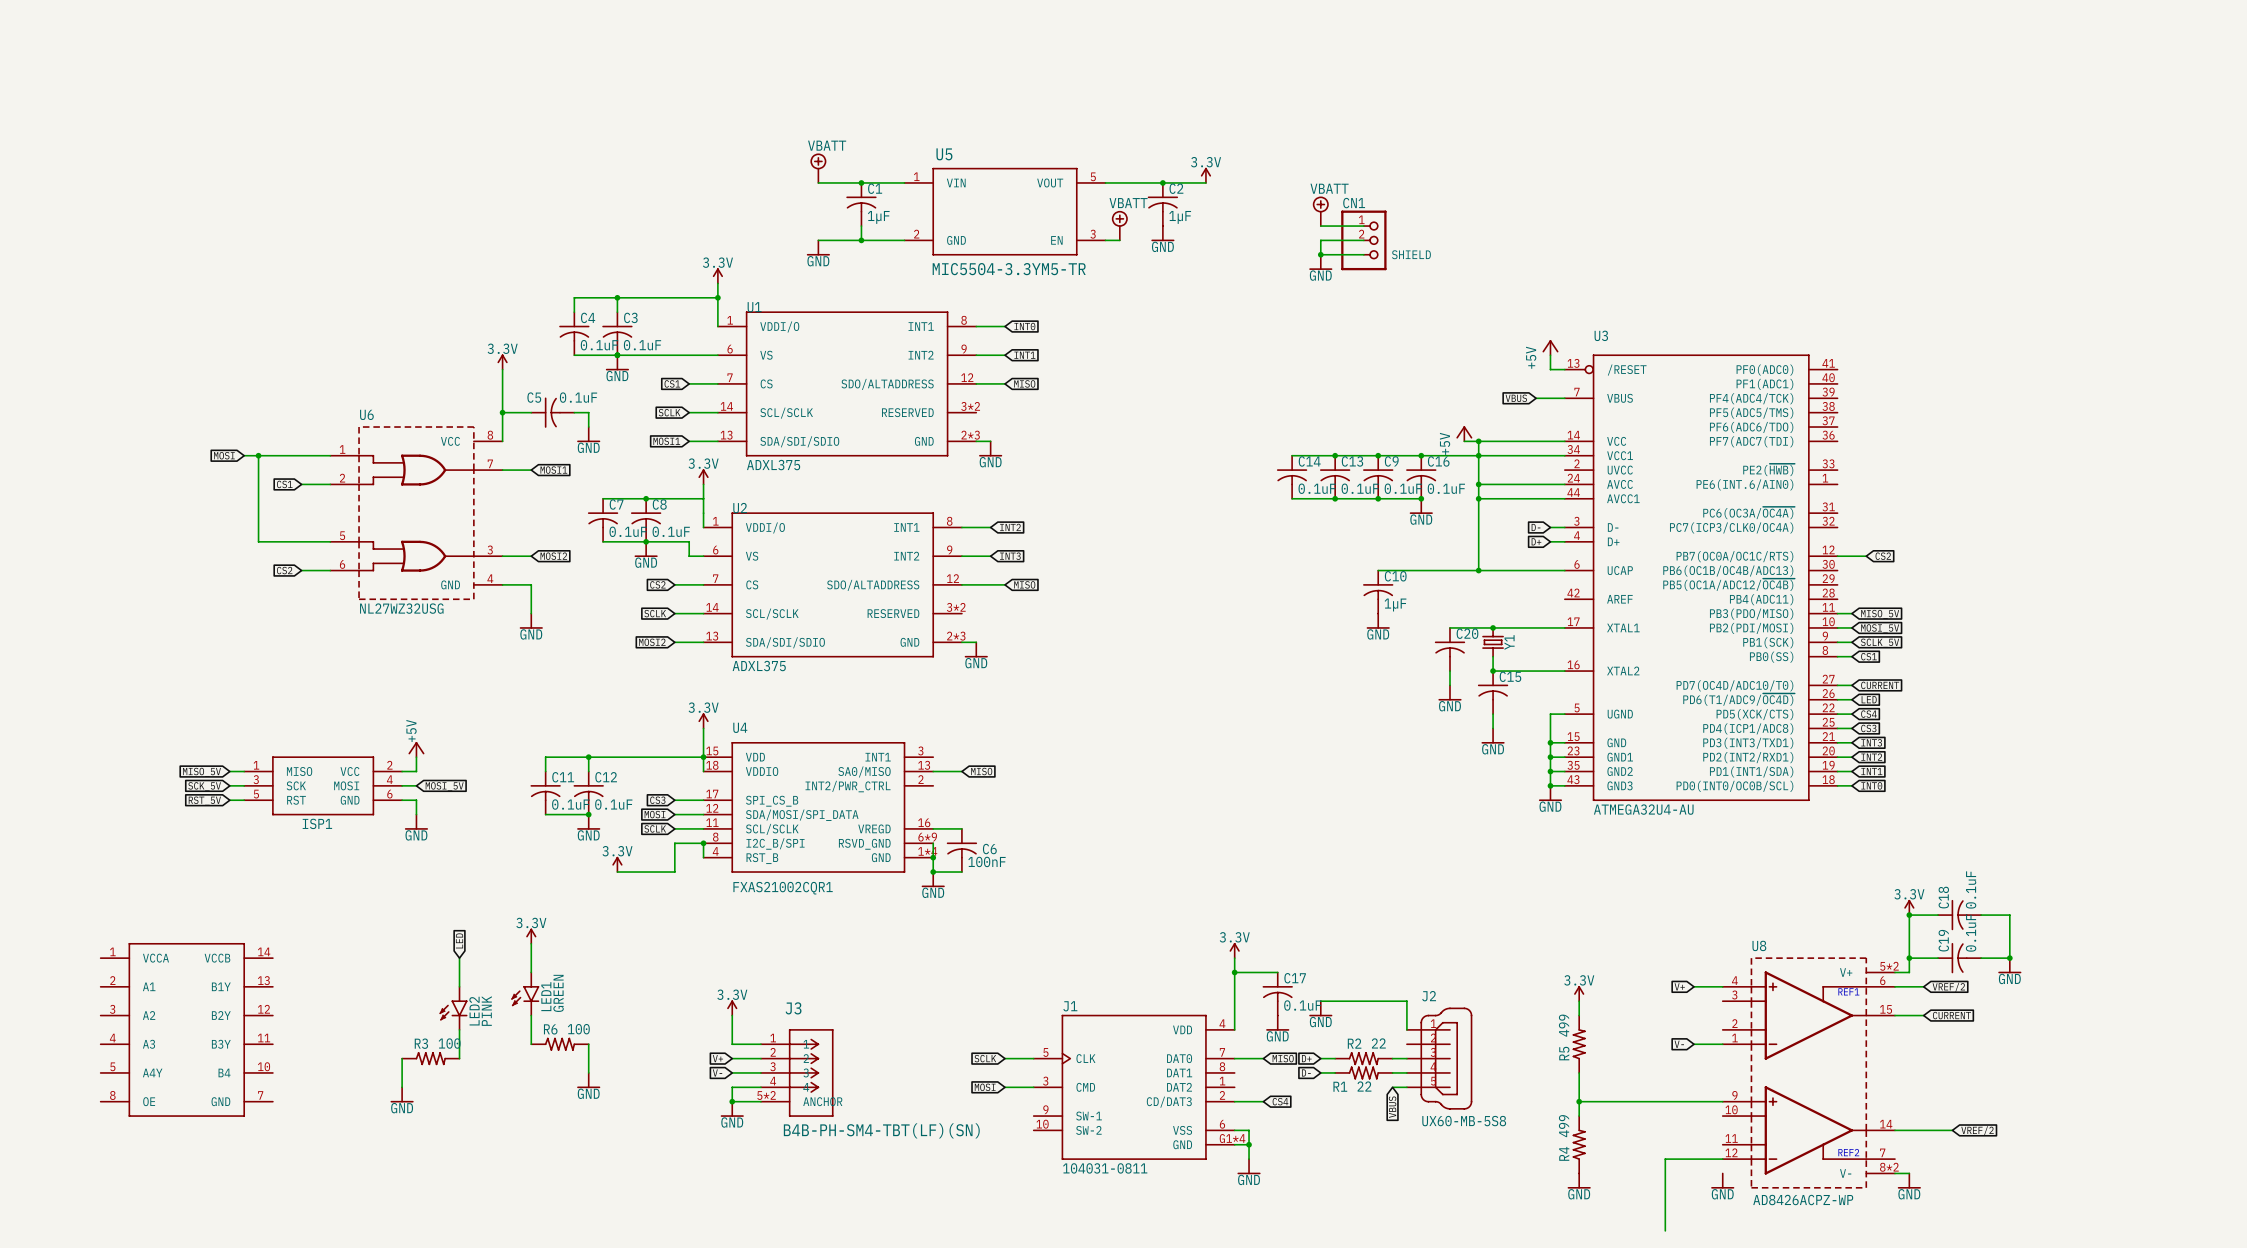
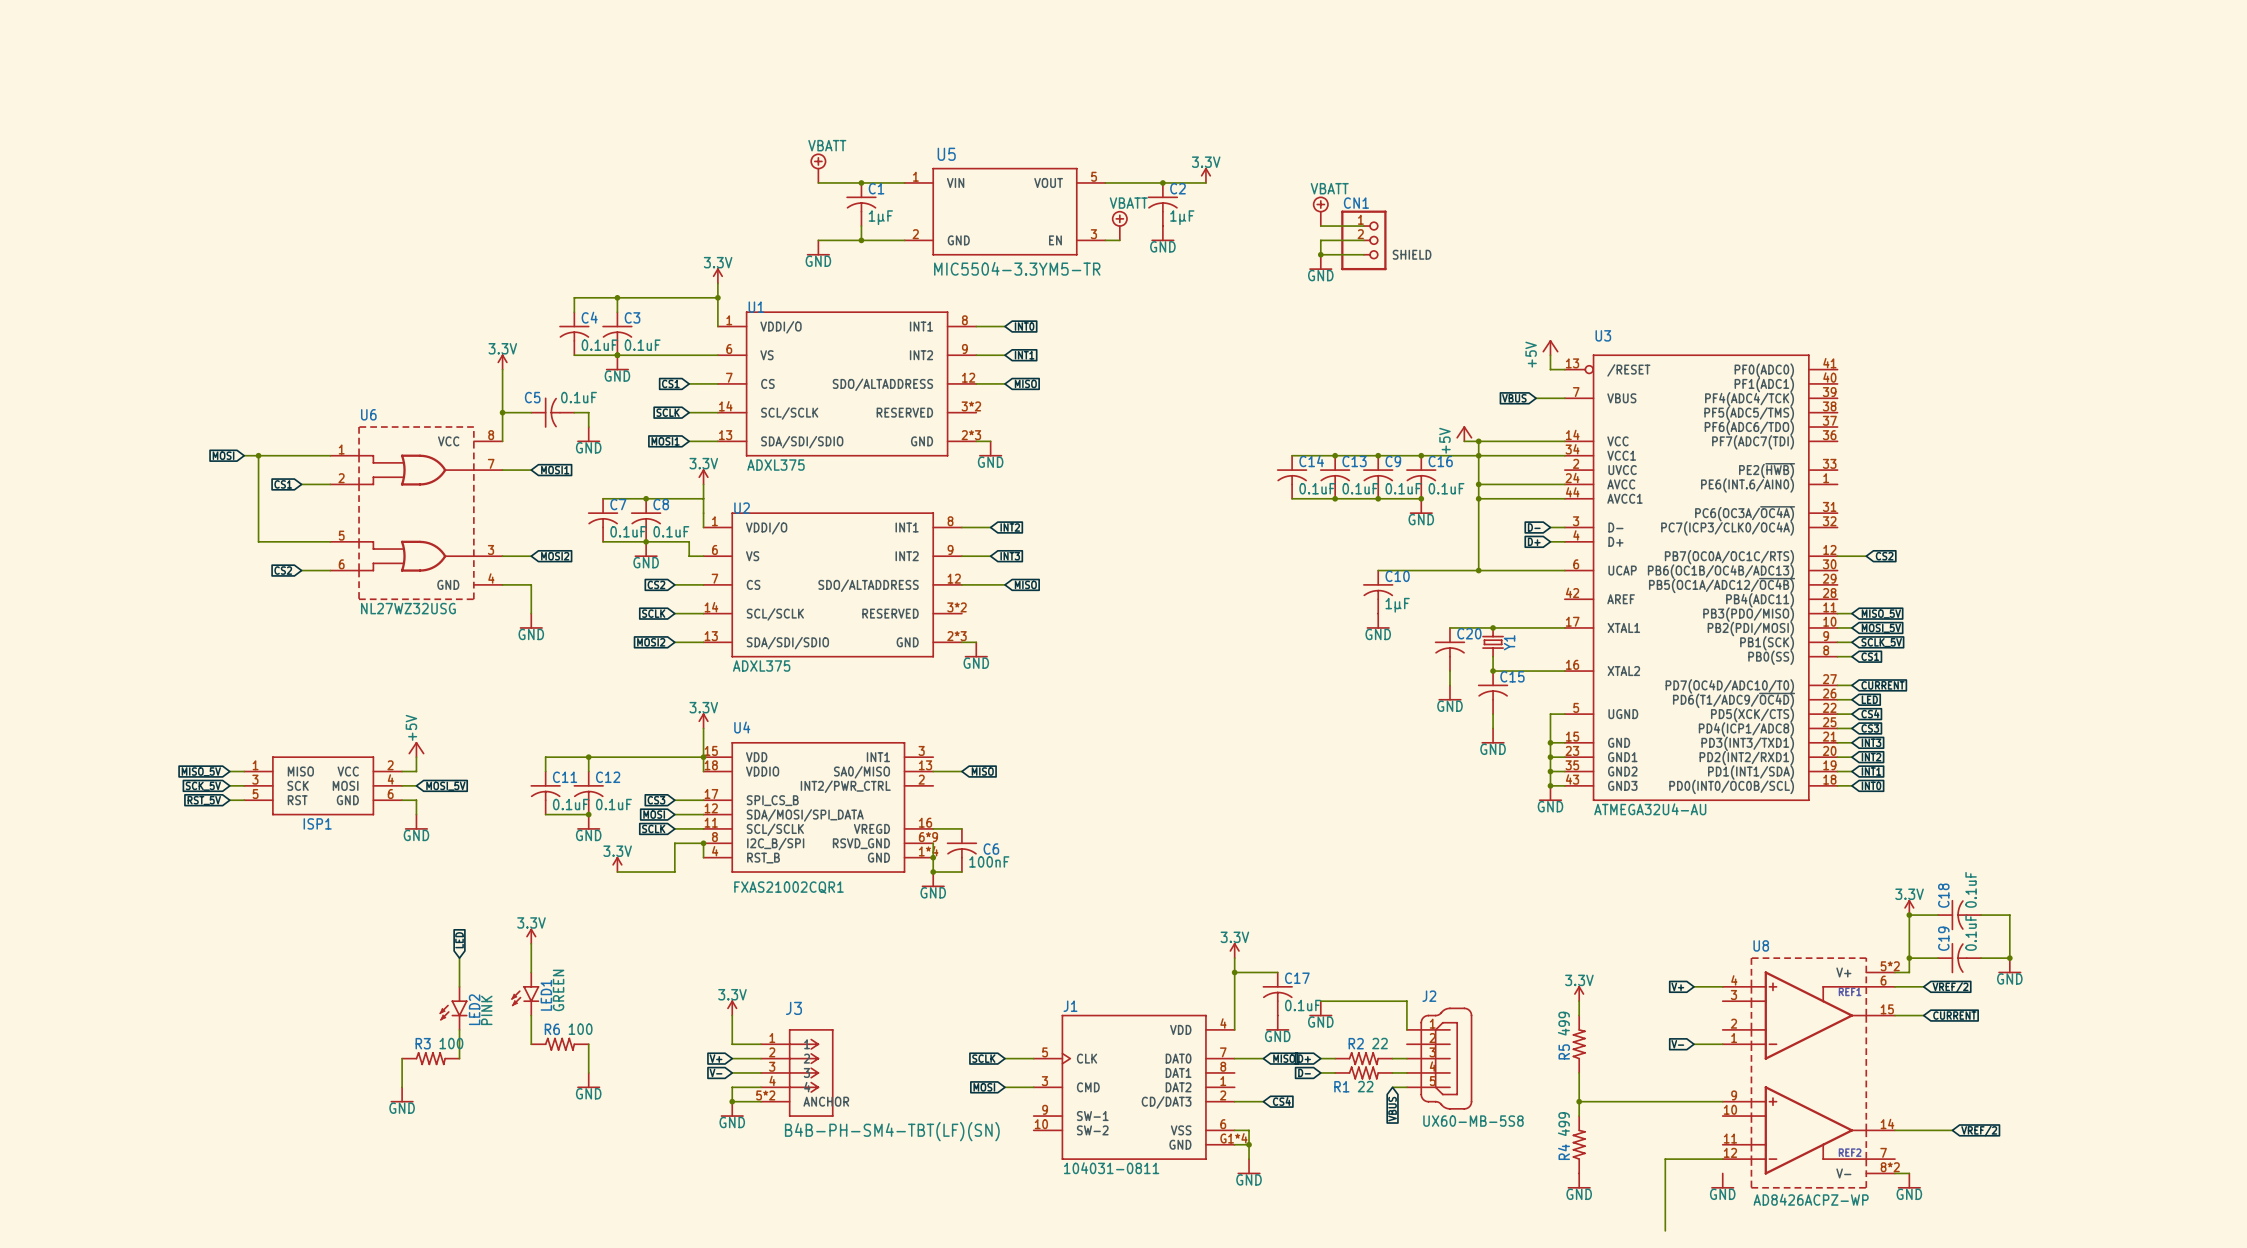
part: (186, 1029) -> none

